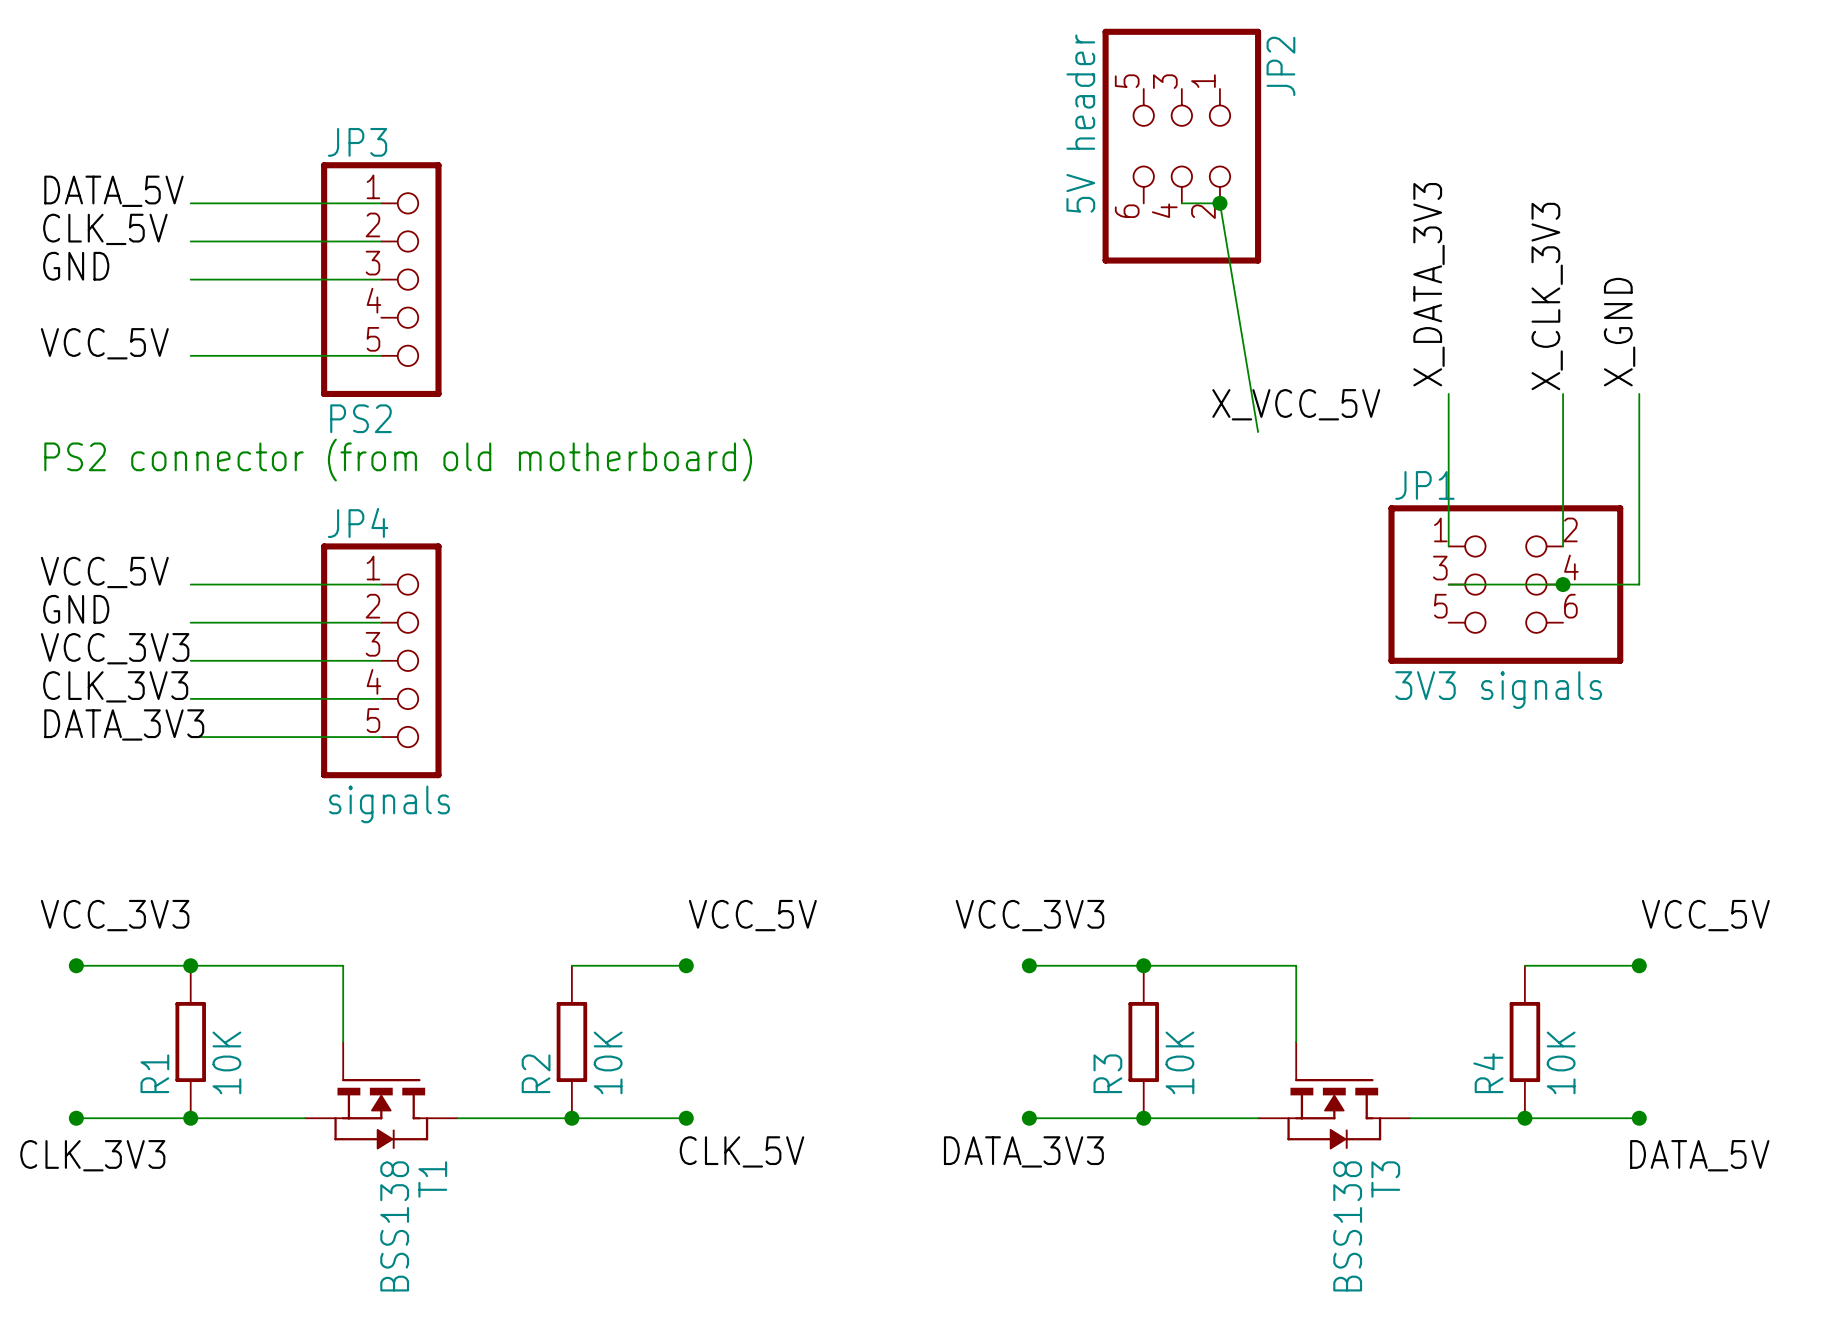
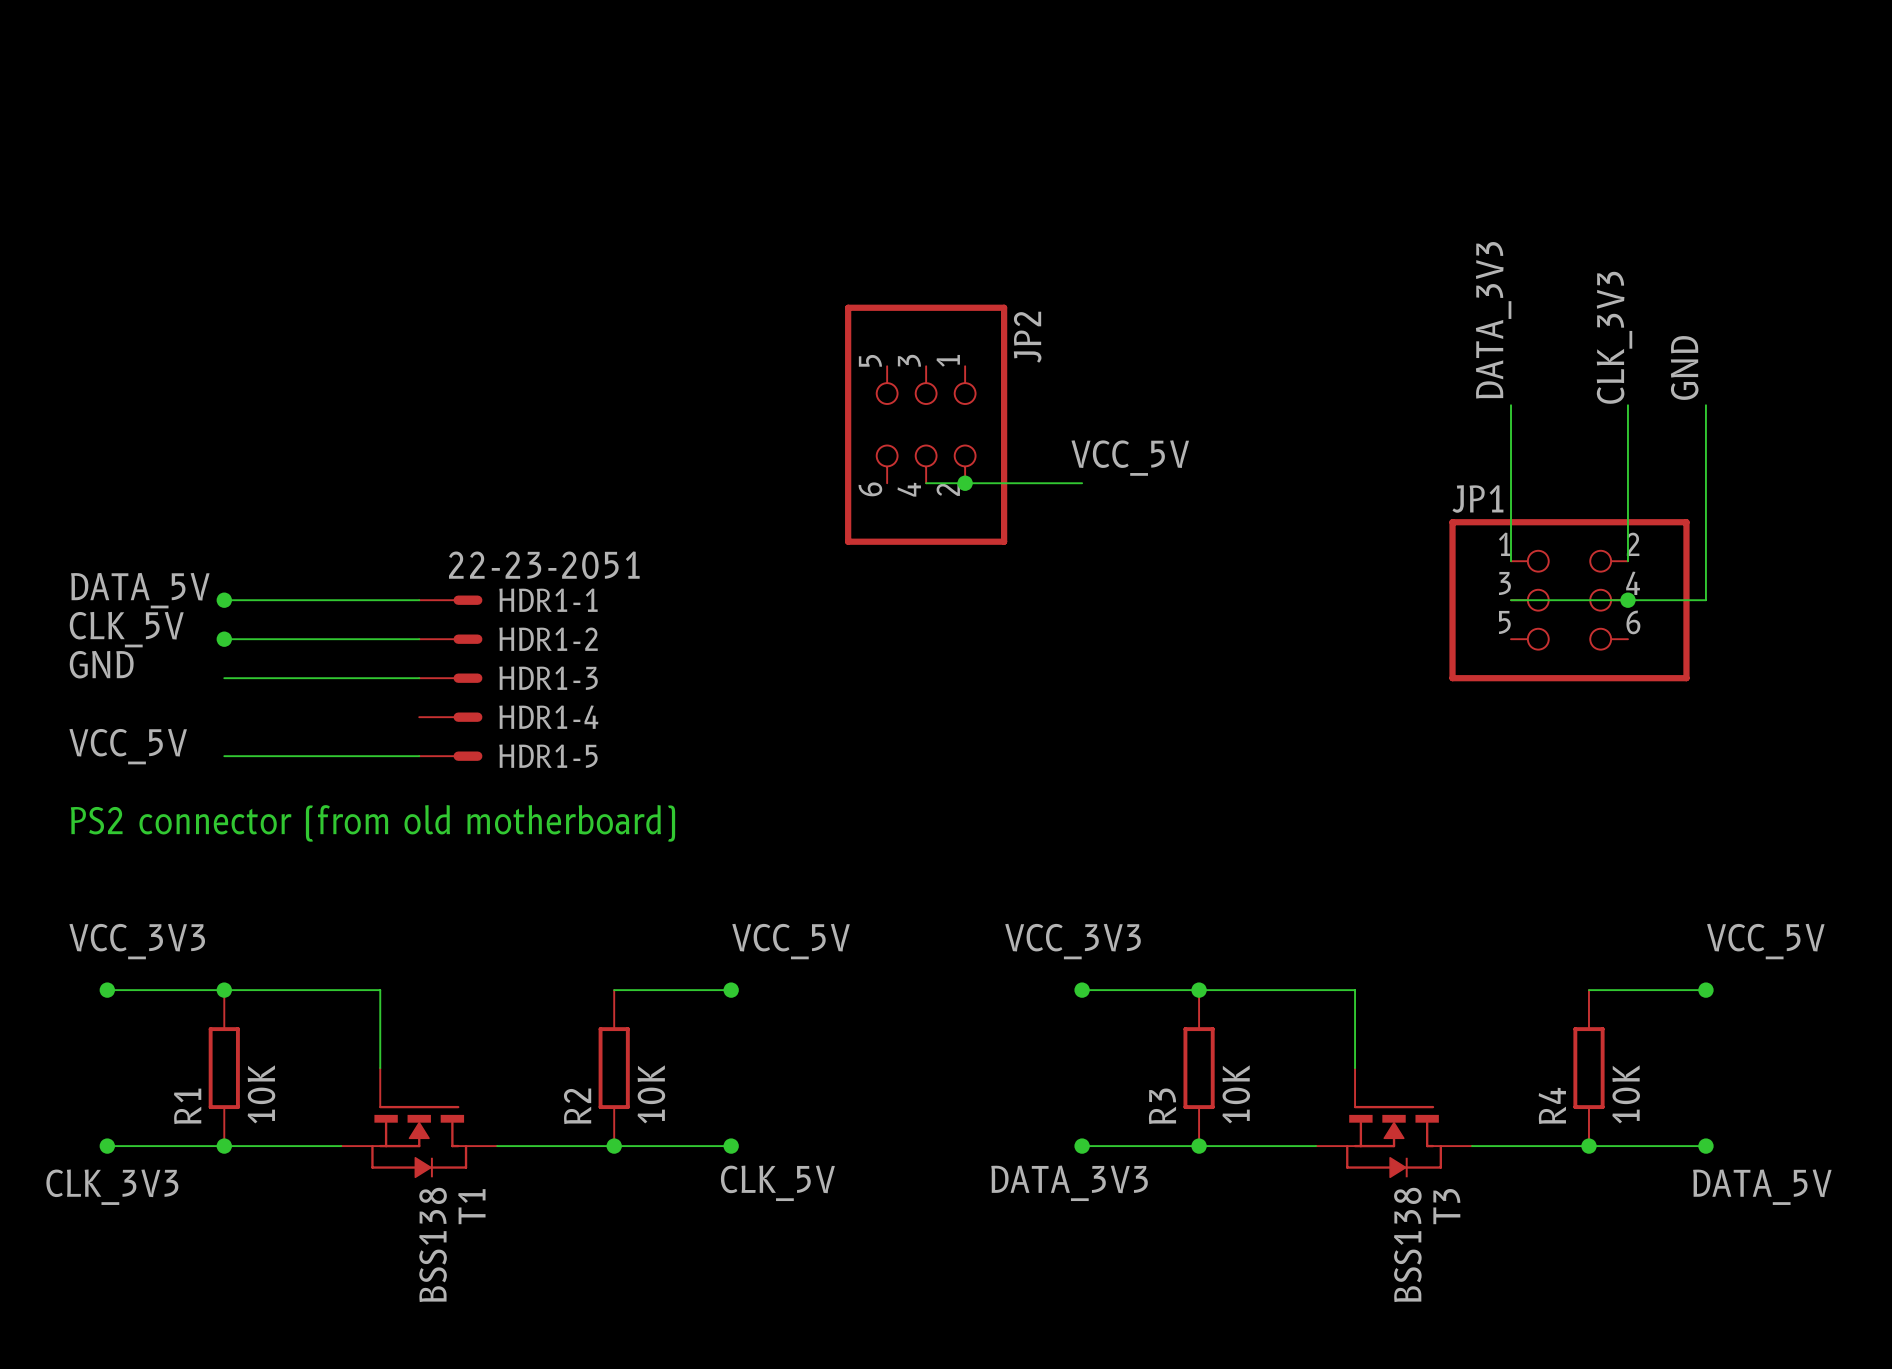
JP2 value: 5V header (1080, 123) -> none
JP2 position: (1181, 146) -> (926, 424)
label: DATA_5V (113, 191) -> none
wire: (190, 203) (381, 203) -> none
wire: (1181, 203) (1219, 203) (1258, 432) -> none
junction: (1219, 203) -> none
label: CLK_5V (105, 229) -> none
wire: (190, 241) (381, 241) -> none
label: GND (76, 266) -> none
wire: (190, 279) (381, 279) -> none
JP3: PS2 (381, 279) -> none
label: X_DATA_3V3 (1428, 284) -> DATA_3V3 (1493, 320)
label: X_CLK_3V3 (1547, 296) -> CLK_3V3 (1614, 337)
label: X_GND (1619, 332) -> GND (1684, 367)
label: VCC_5V (104, 343) -> none
wire: (190, 355) (381, 355) -> none
label: X_VCC_5V (1296, 404) -> none
label: none -> VCC_5V (1130, 458)
text position: PS2 connector (from old motherboard) (398, 460) -> PS2 connector (from old motherboard) (372, 823)
wire: none -> (926, 483) (1082, 483)
junction: none -> (965, 483)
label: VCC_5V (104, 572) -> DATA_5V (140, 590)
junction: none -> (224, 600)
HDR1-1: none -> 22-23-2051 (450, 600)
label: GND (76, 609) -> CLK_5V (126, 629)
junction: none -> (224, 639)
HDR1-2: none -> (450, 639)
label: VCC_3V3 (115, 648) -> GND (101, 664)
JP4: signals (381, 660) -> none
HDR1-3: none -> (450, 678)
label: CLK_3V3 (115, 686) -> none
JP1 value: 3V3 signals (1498, 690) -> none
wire: (190, 698) (381, 698) -> none
HDR1-4: none -> (450, 717)
label: DATA_3V3 (124, 724) -> VCC_5V (128, 746)
HDR1-5: none -> (450, 756)

